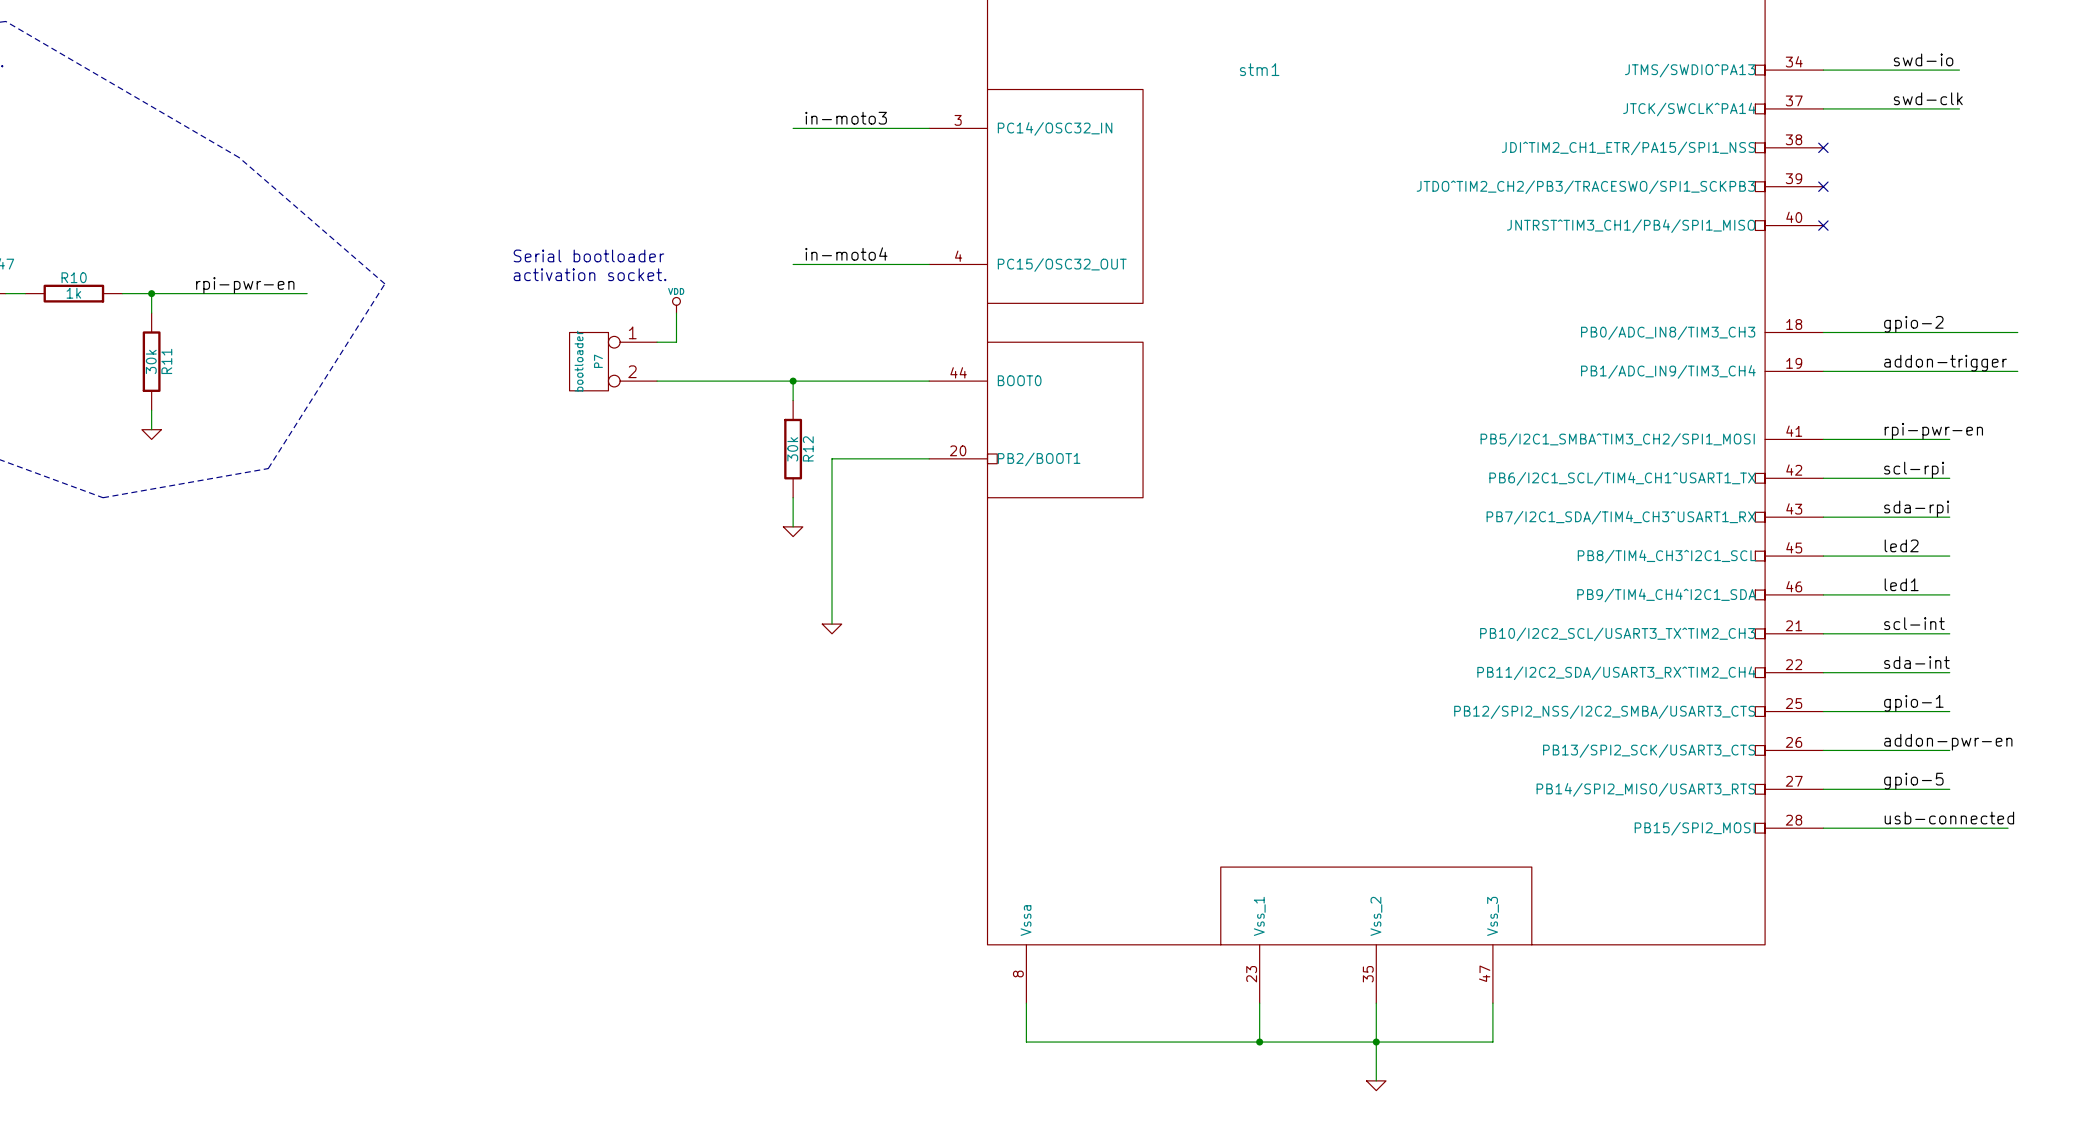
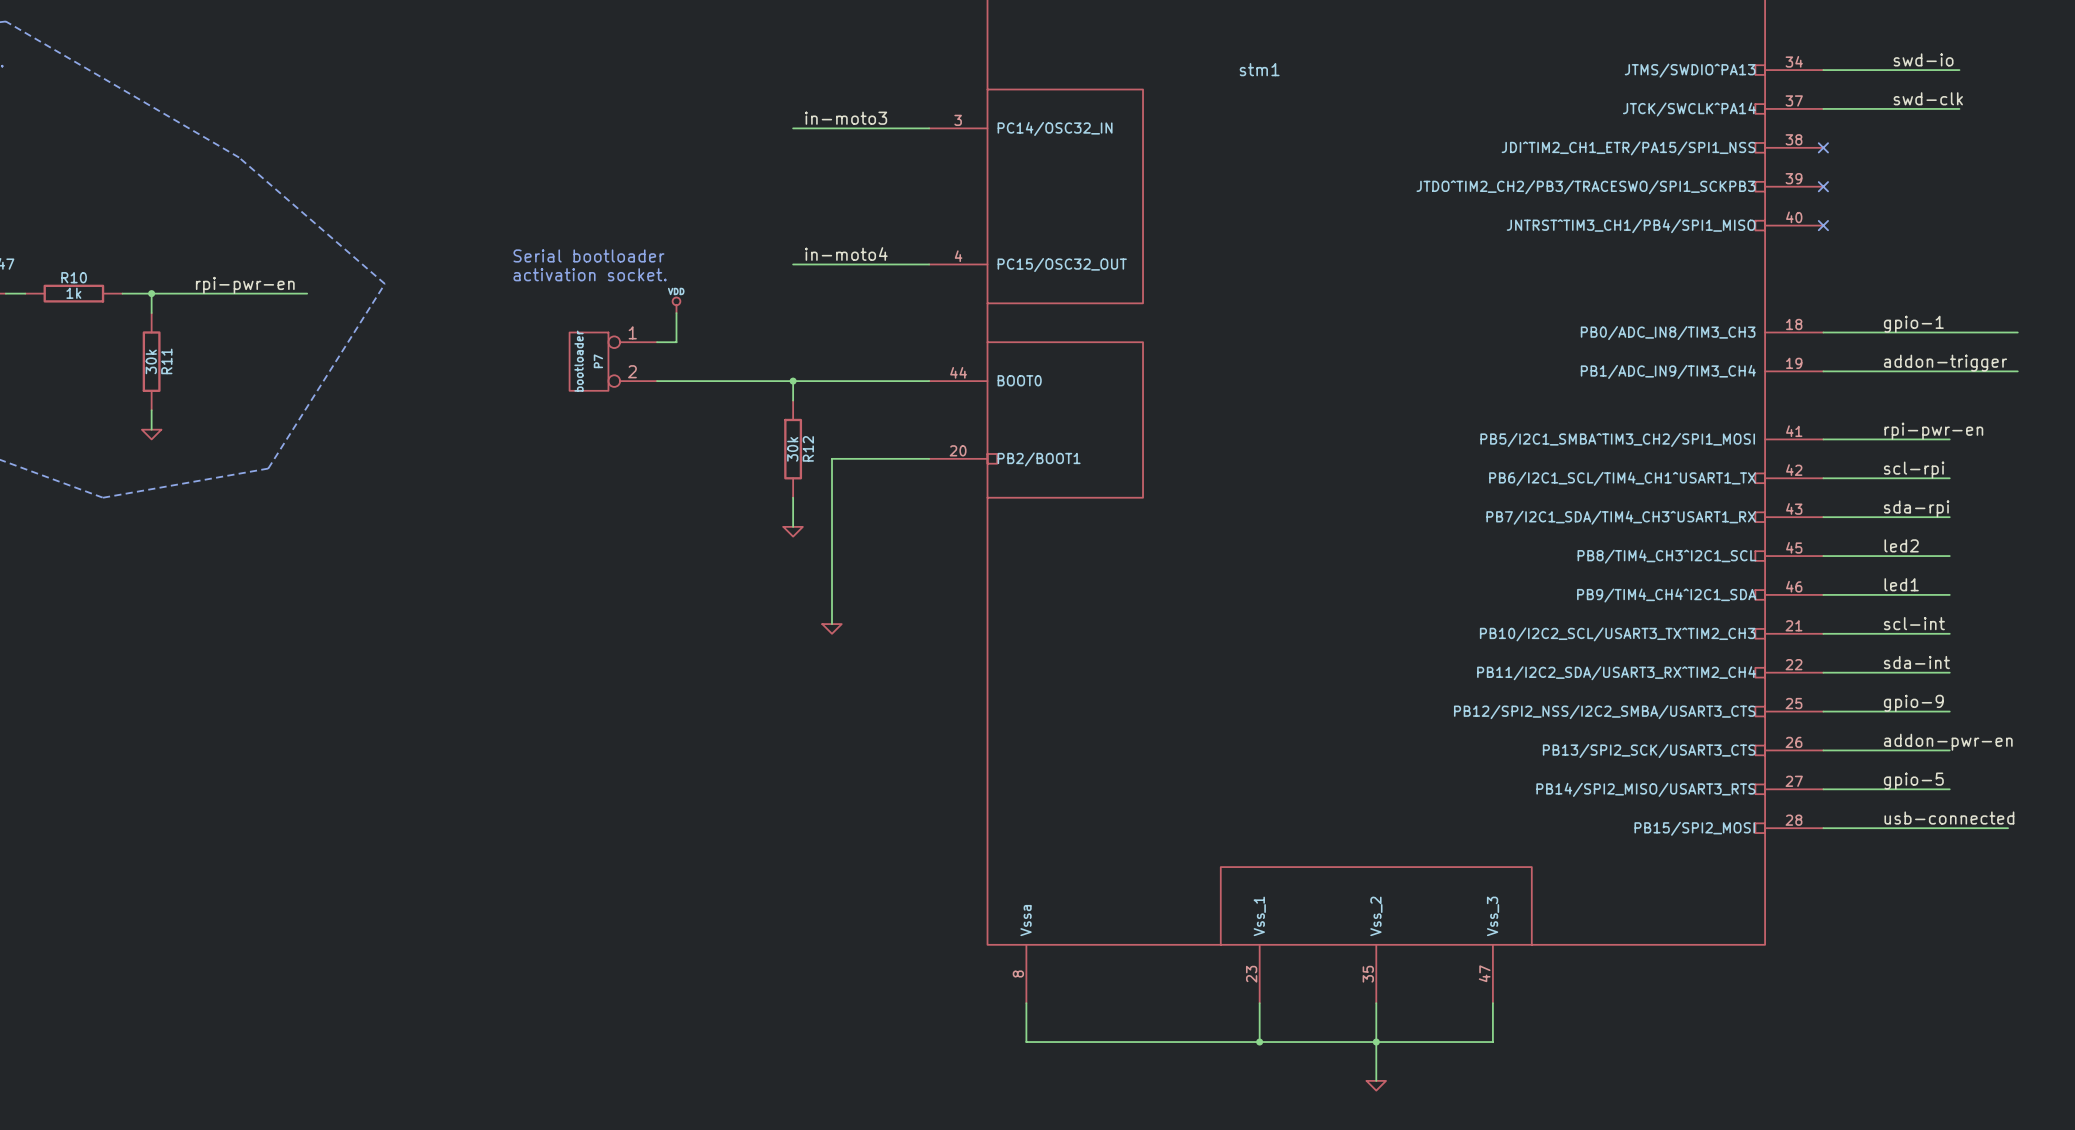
label: gpio-2 (1913, 324) -> gpio-1 (1913, 324)
label: gpio-1 (1913, 703) -> gpio-9 (1913, 703)

